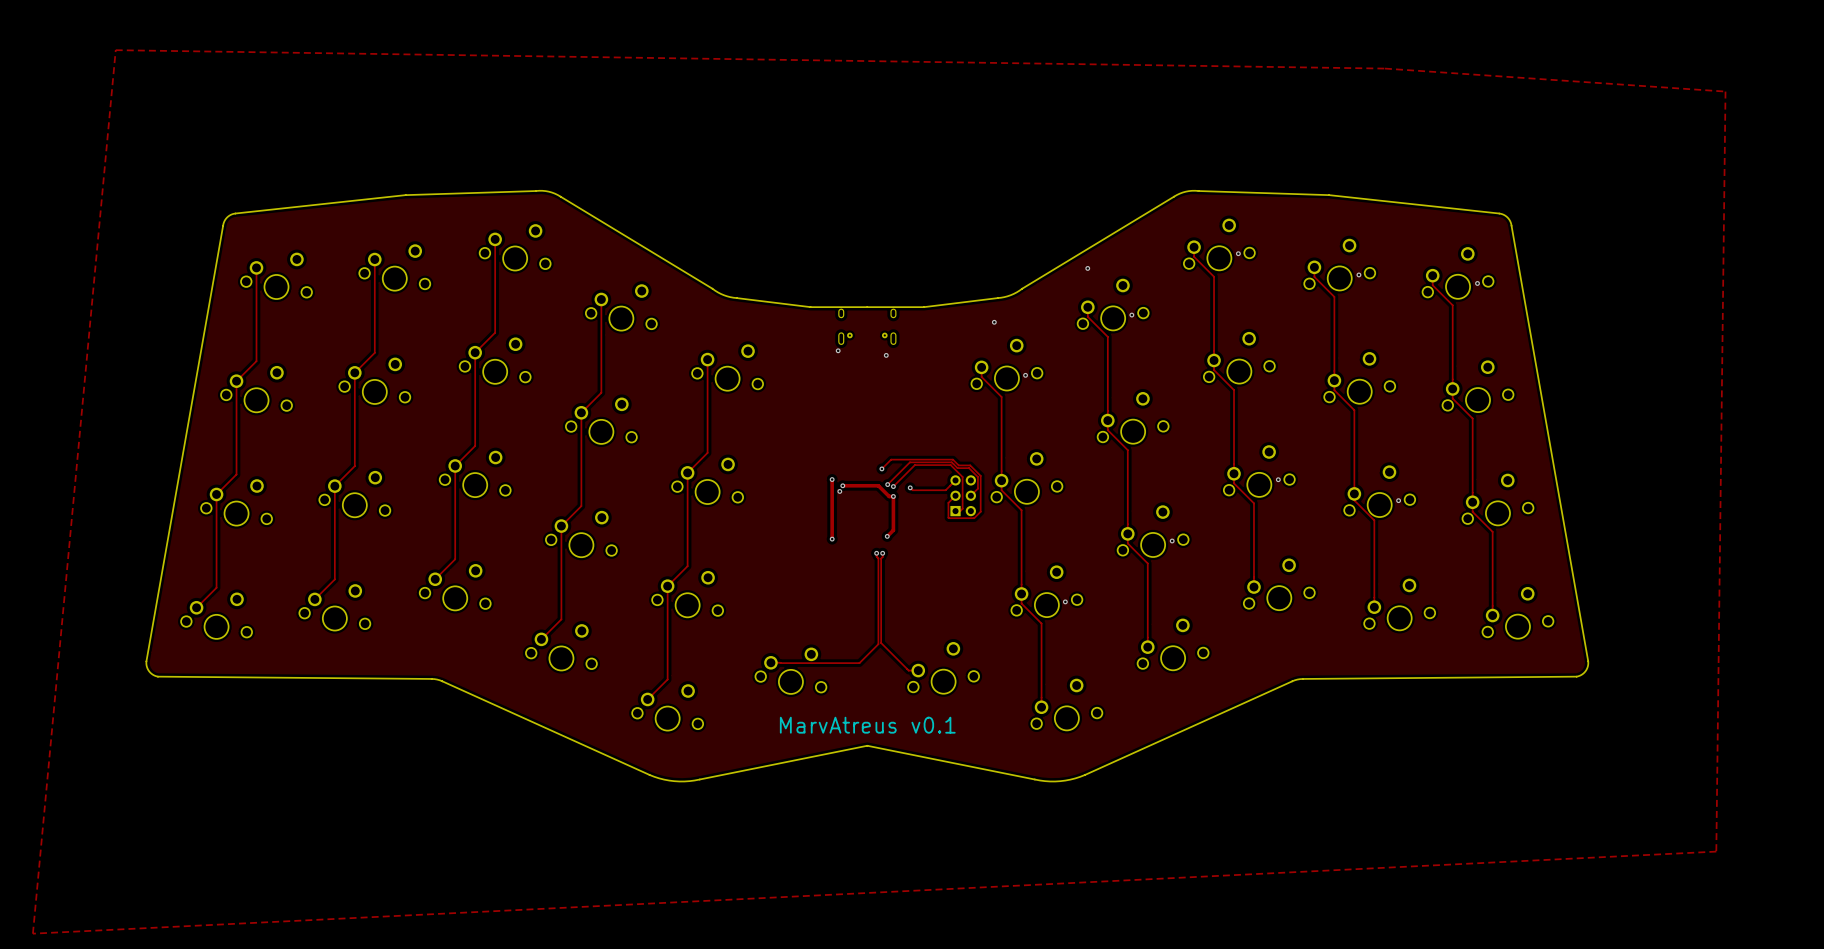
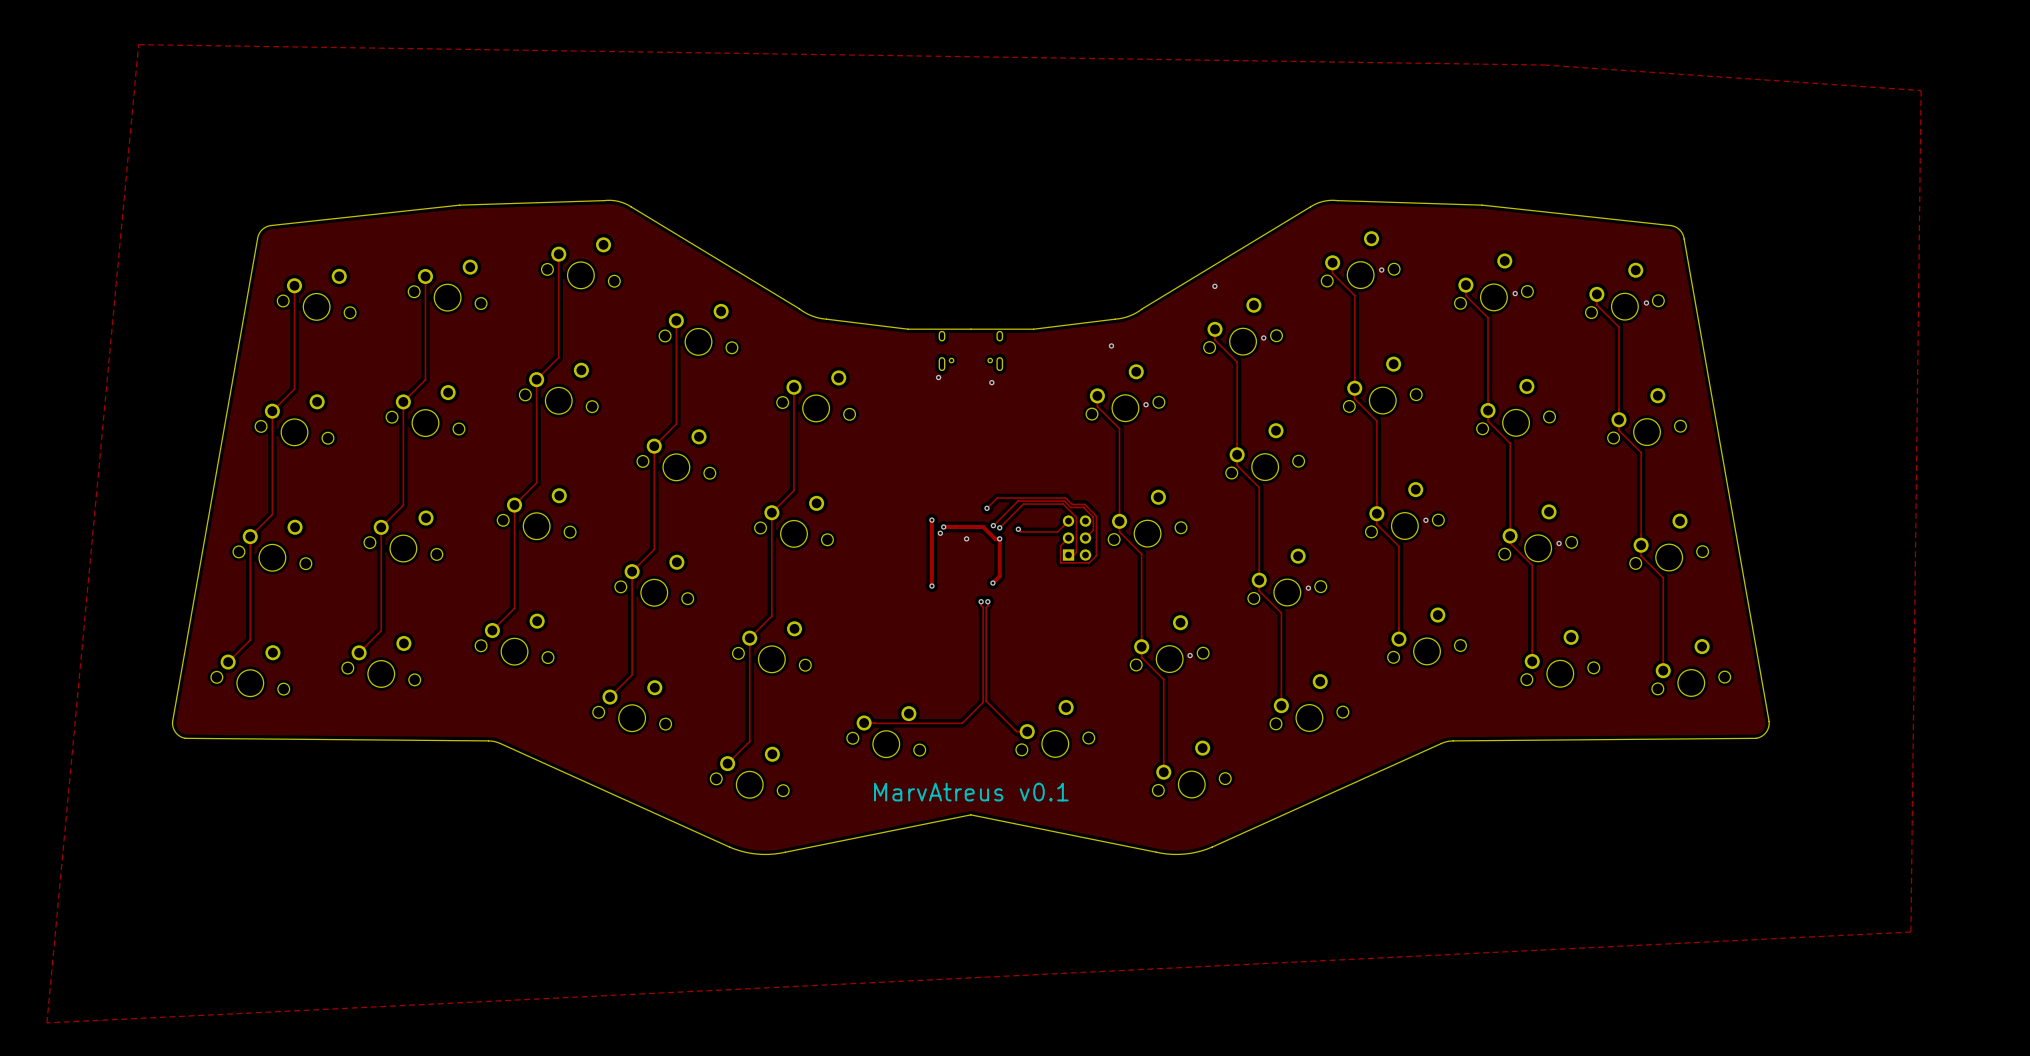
via: none -> (966, 538)

